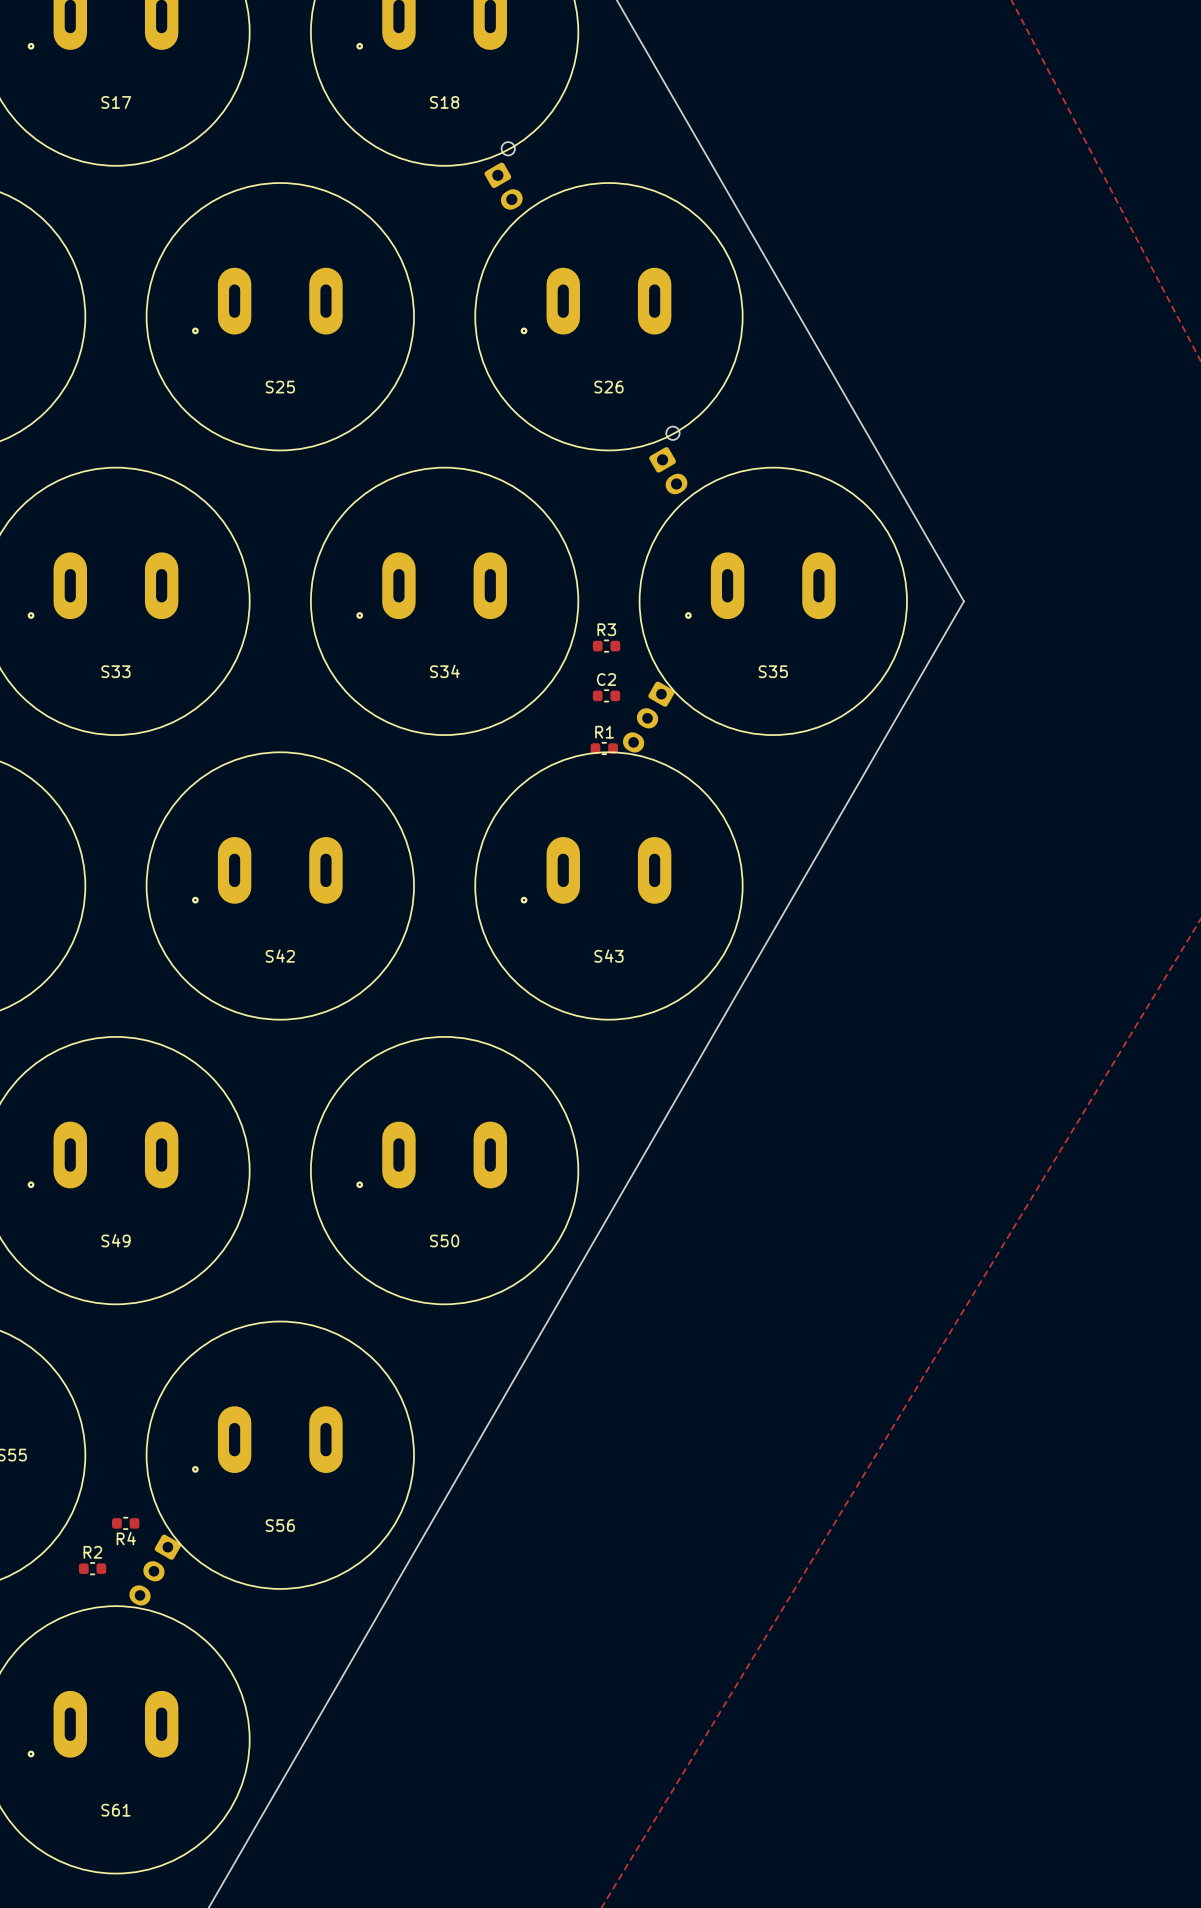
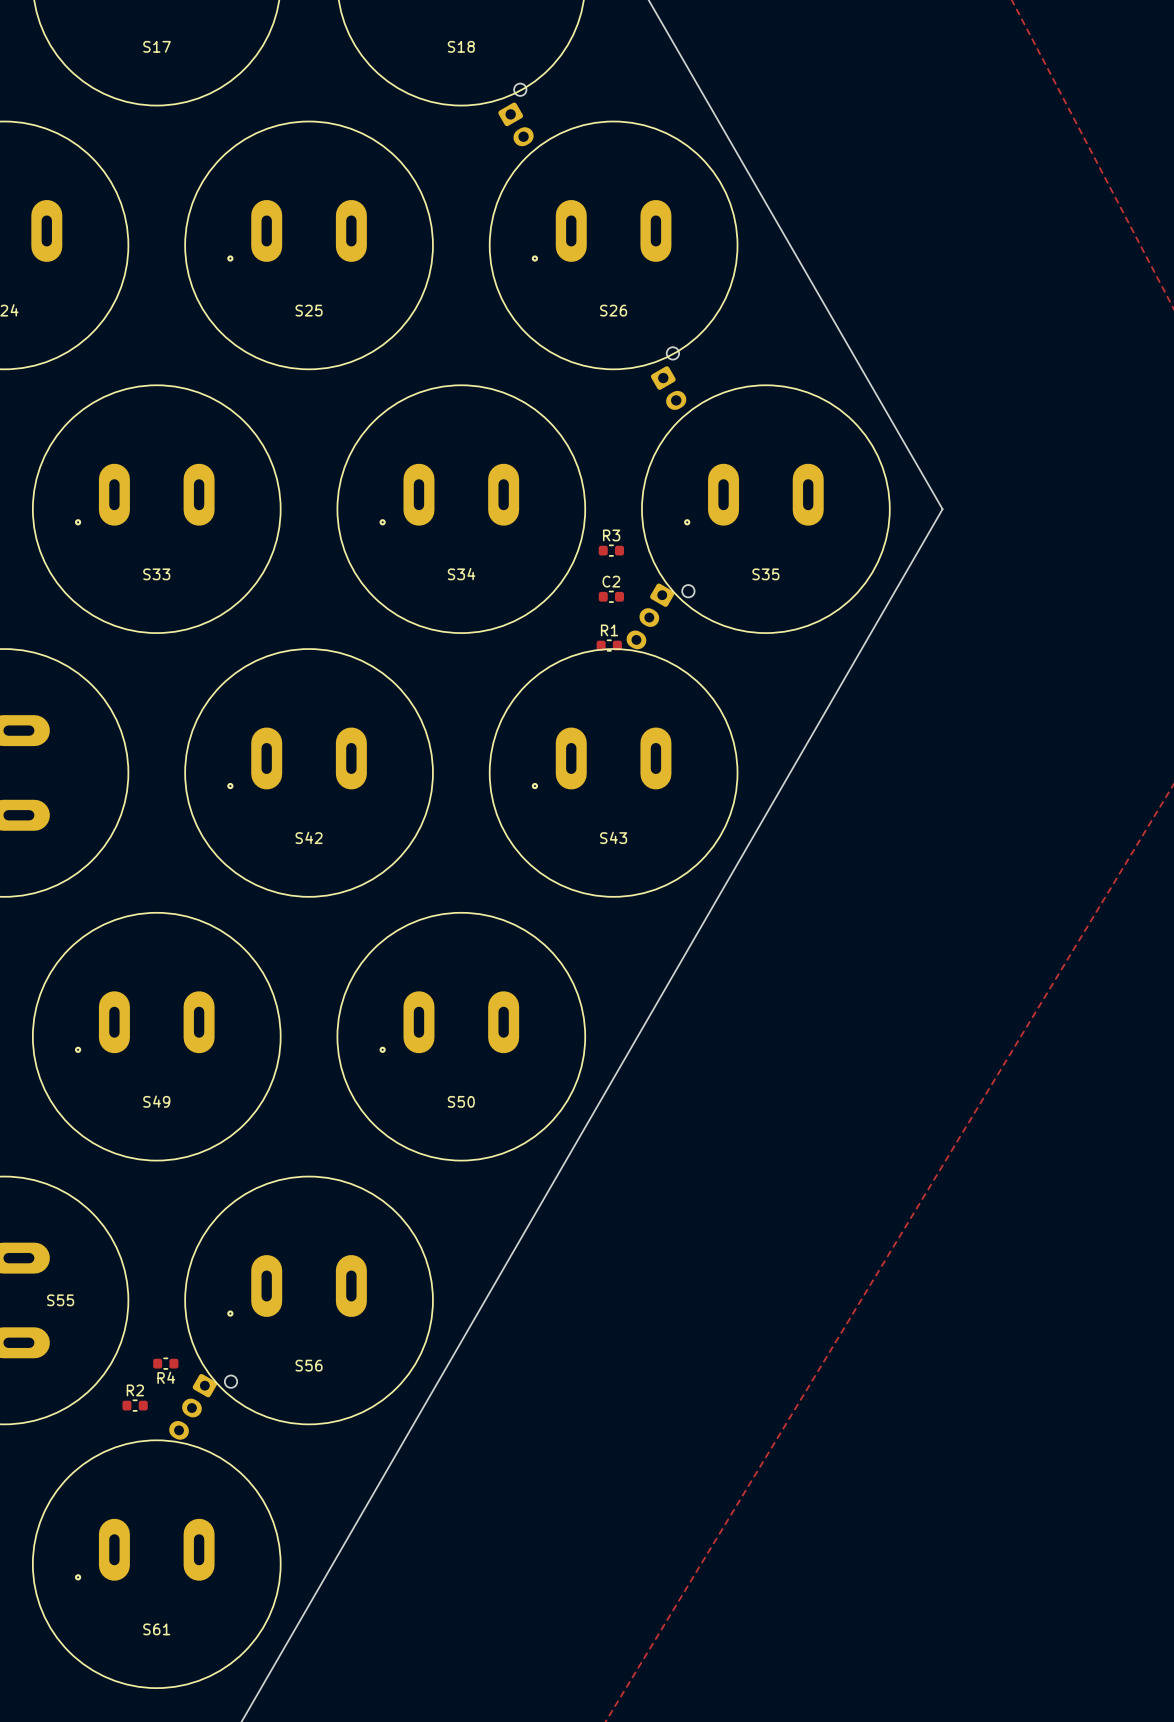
part footprint: [622, 681, 675, 753] -> [626, 583, 695, 650]
part footprint: [129, 1534, 181, 1606] -> [169, 1373, 238, 1440]

